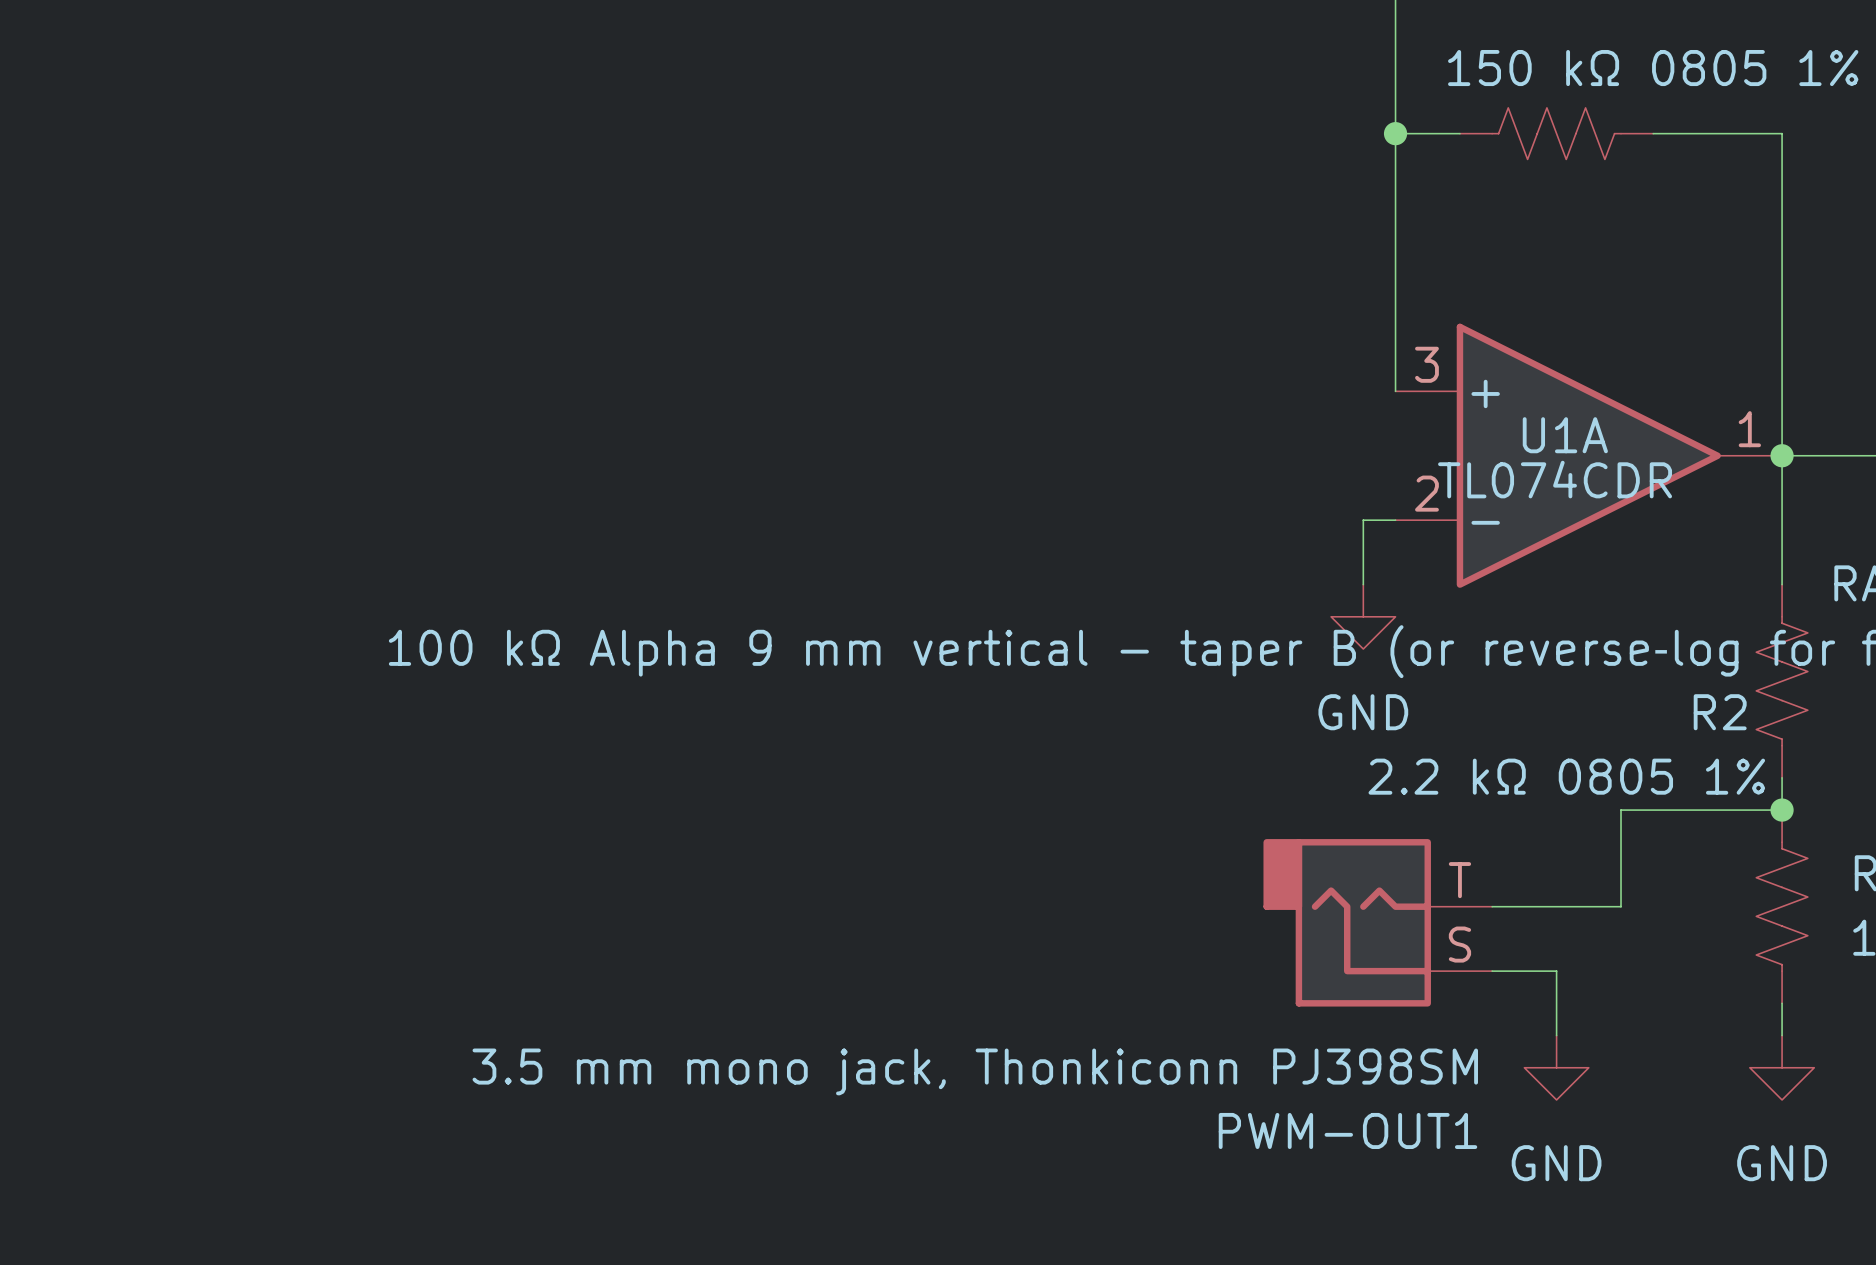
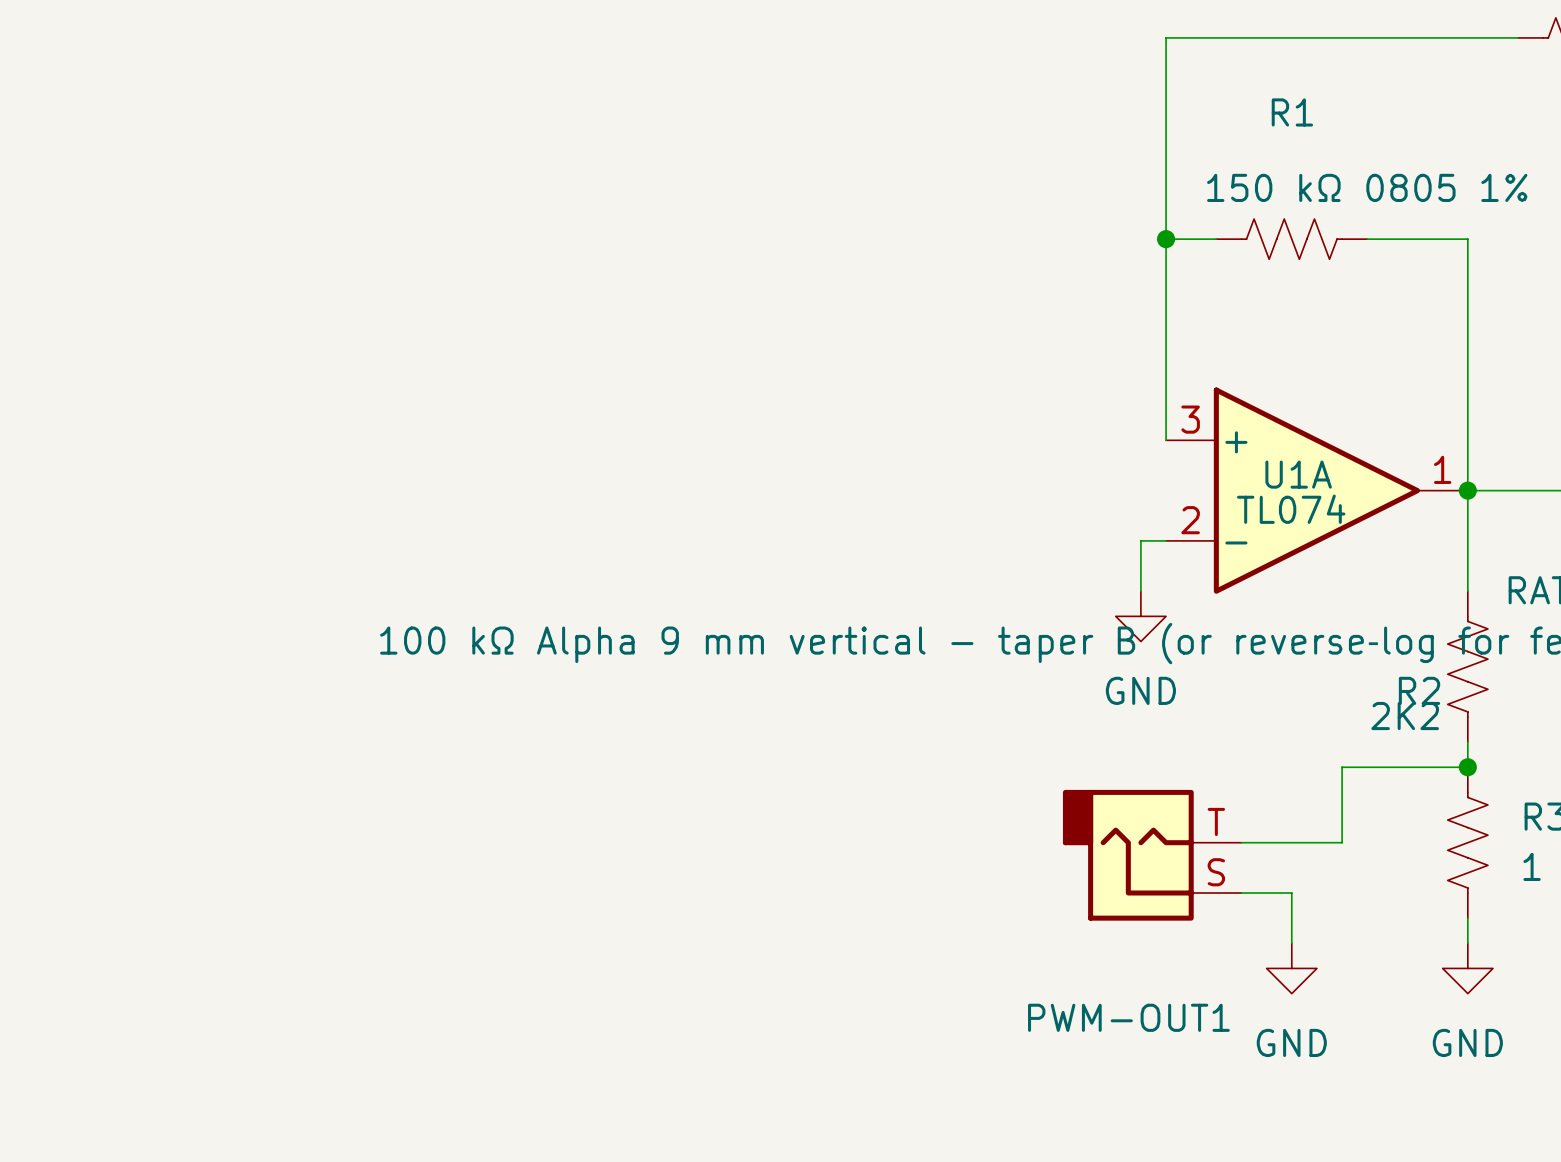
U1A value: TL074CDR (1555, 479) -> TL074 (1291, 509)
R2 value: 2.2 kΩ 0805 1% (1566, 776) -> 2K2 (1405, 716)
PWM-OUT1 value: 3.5 mm mono jack, Thonkiconn PJ398SM (975, 1071) -> none

